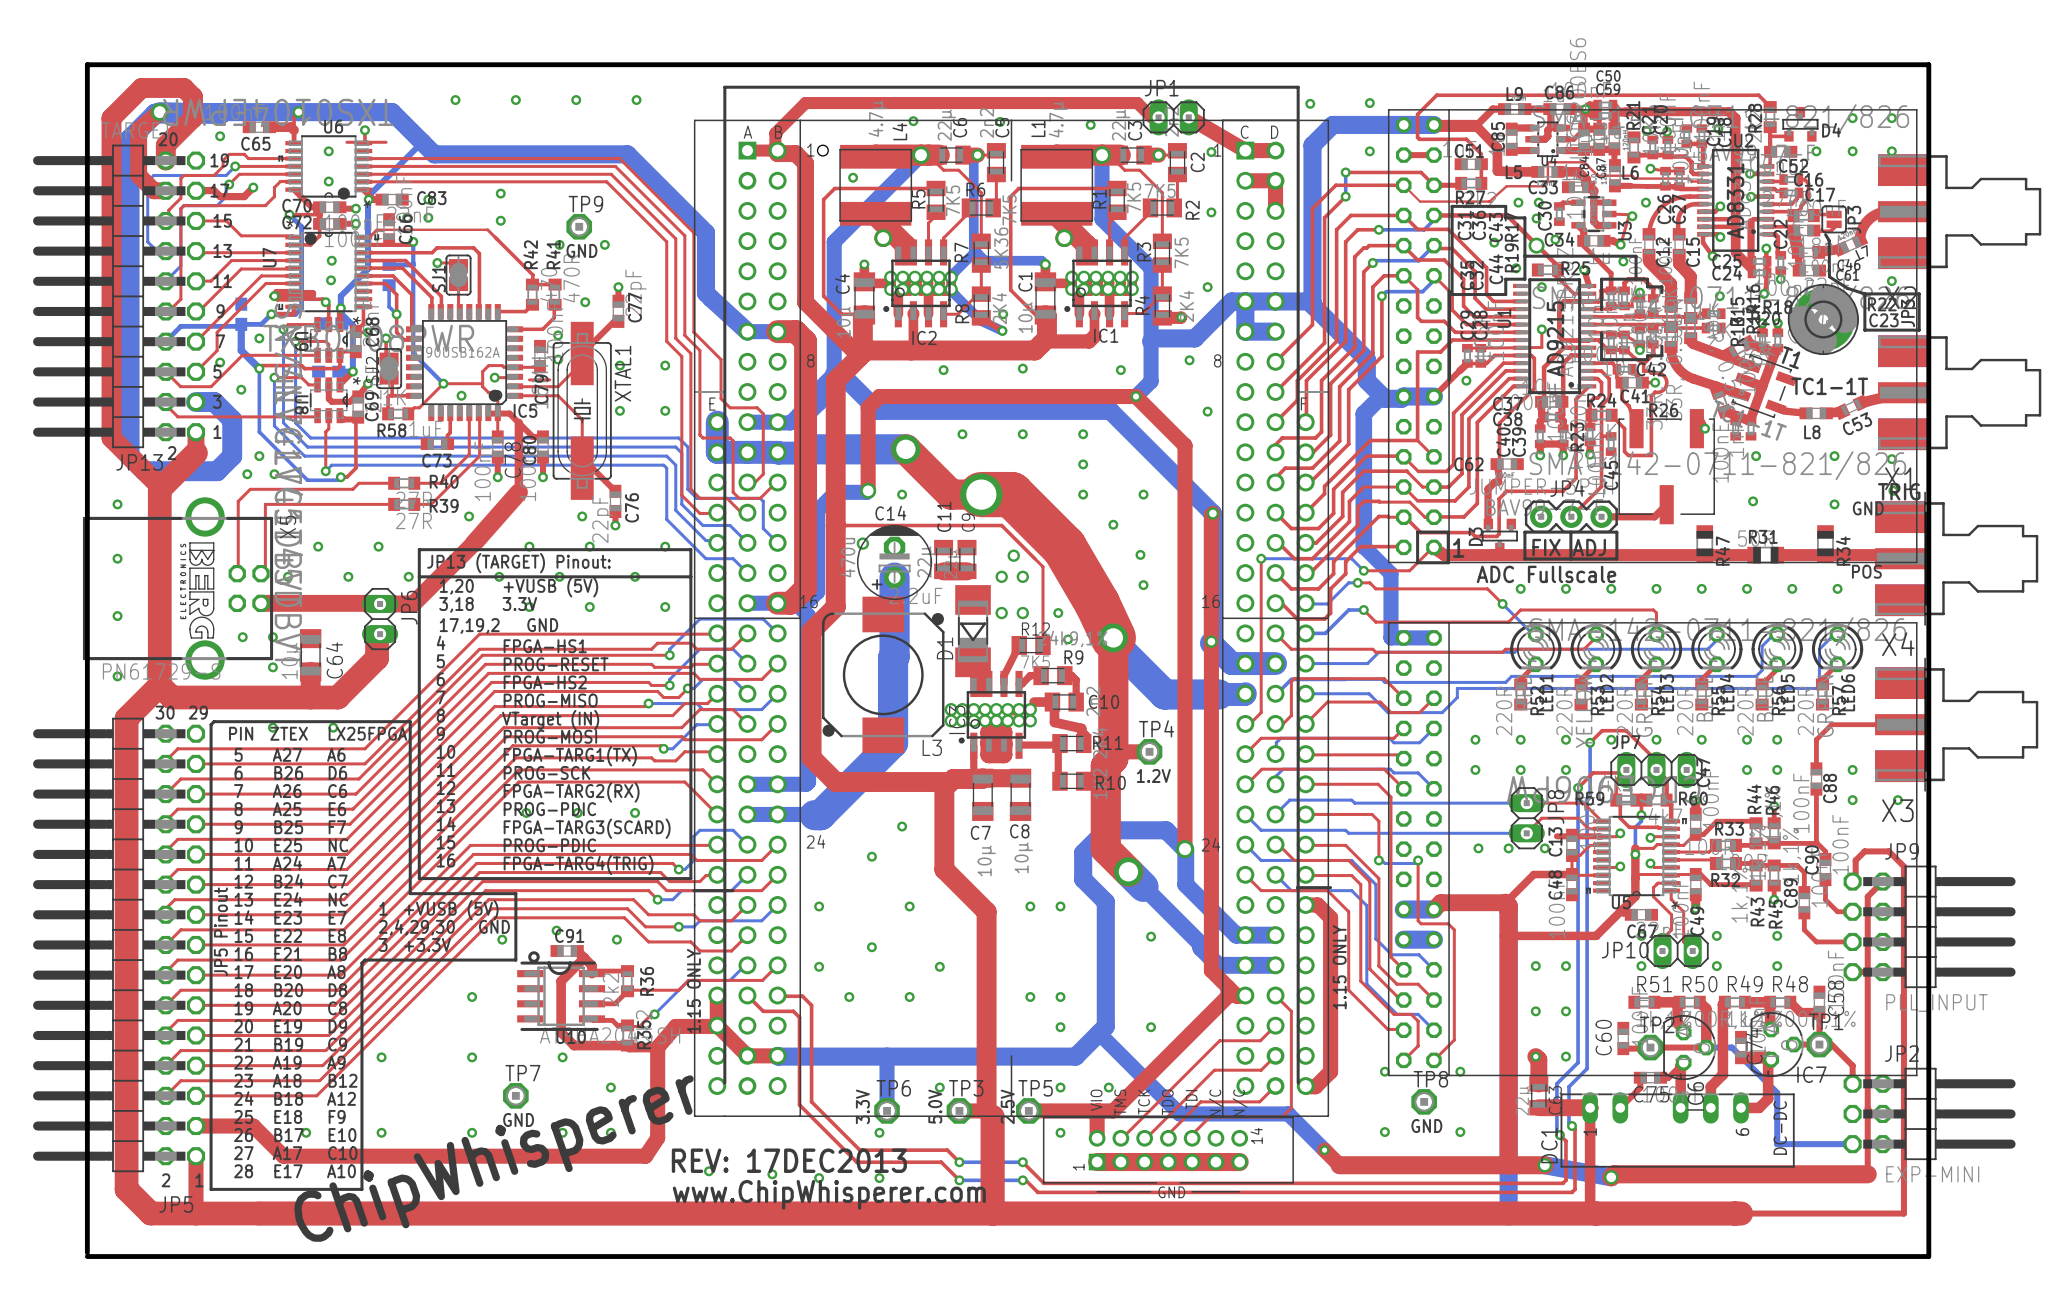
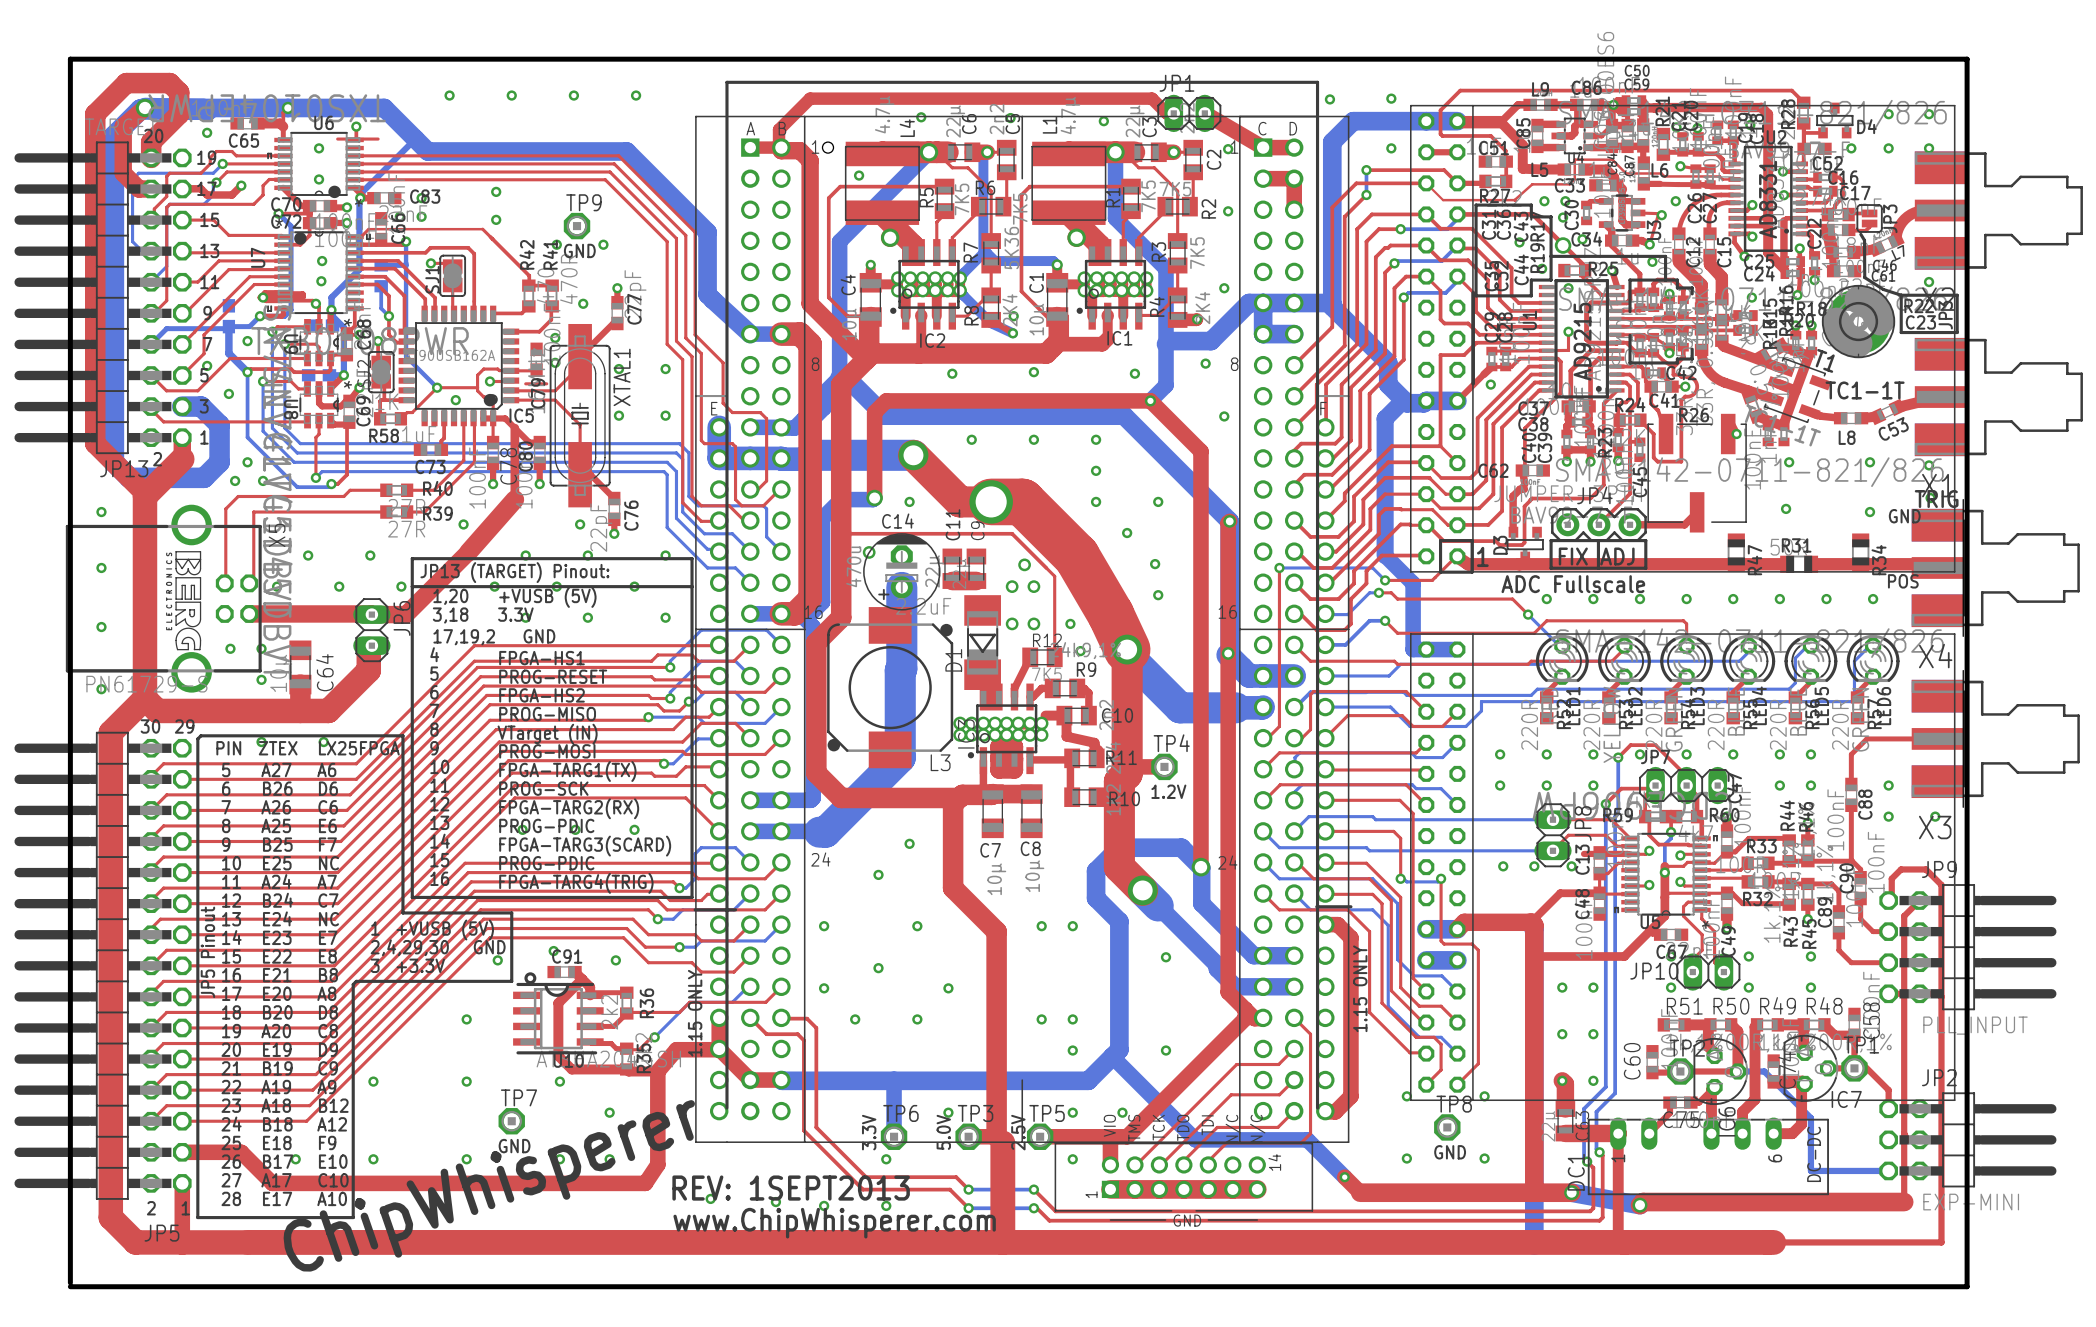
text: REV: 17DEC2013 (789, 1160) -> REV: 1SEPT2013 (791, 1188)

